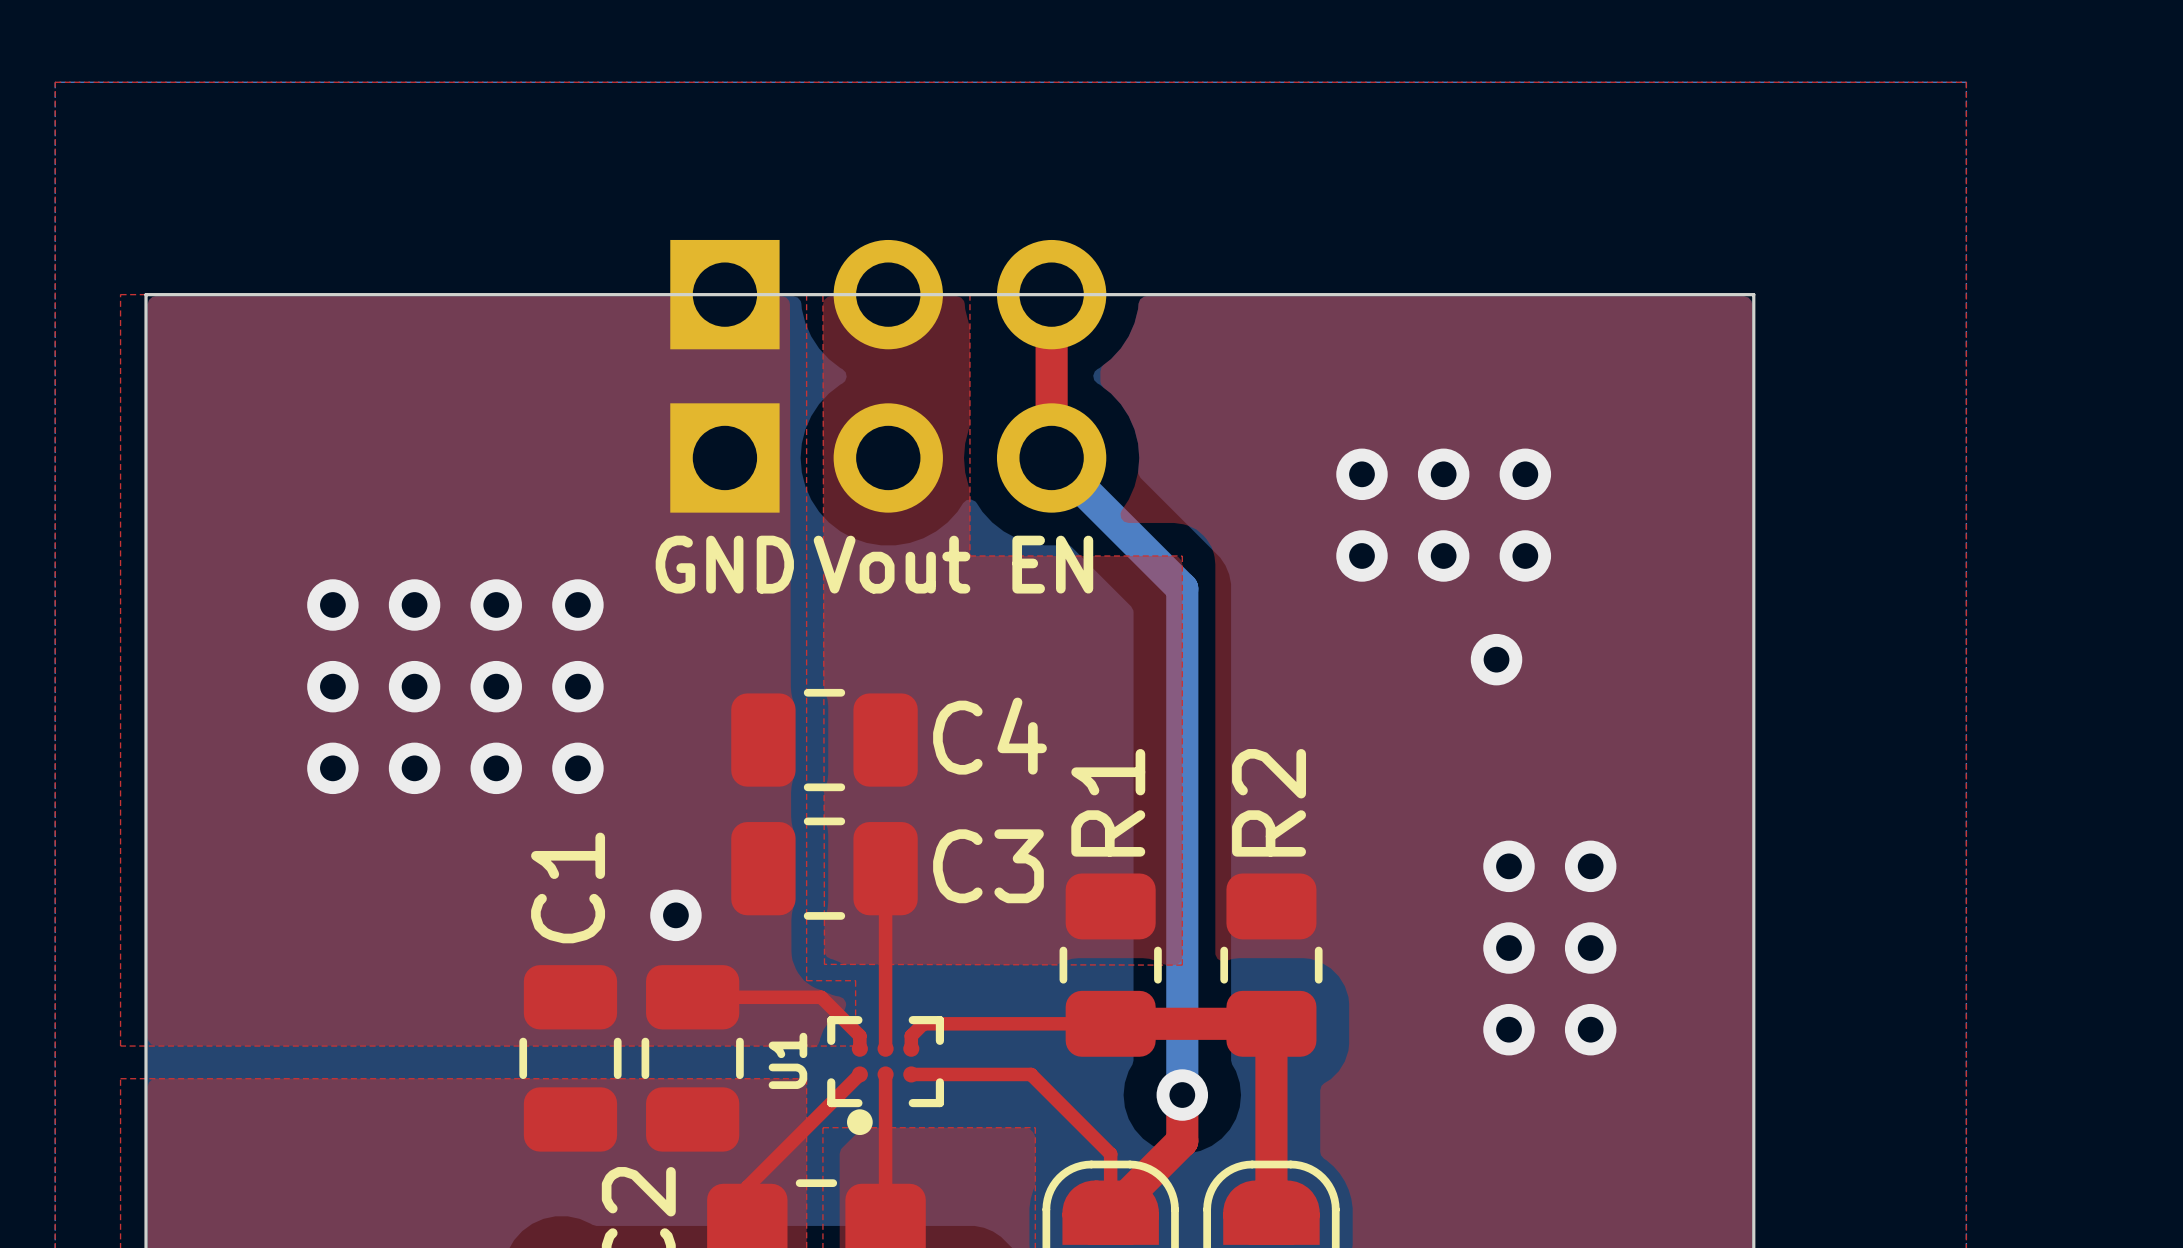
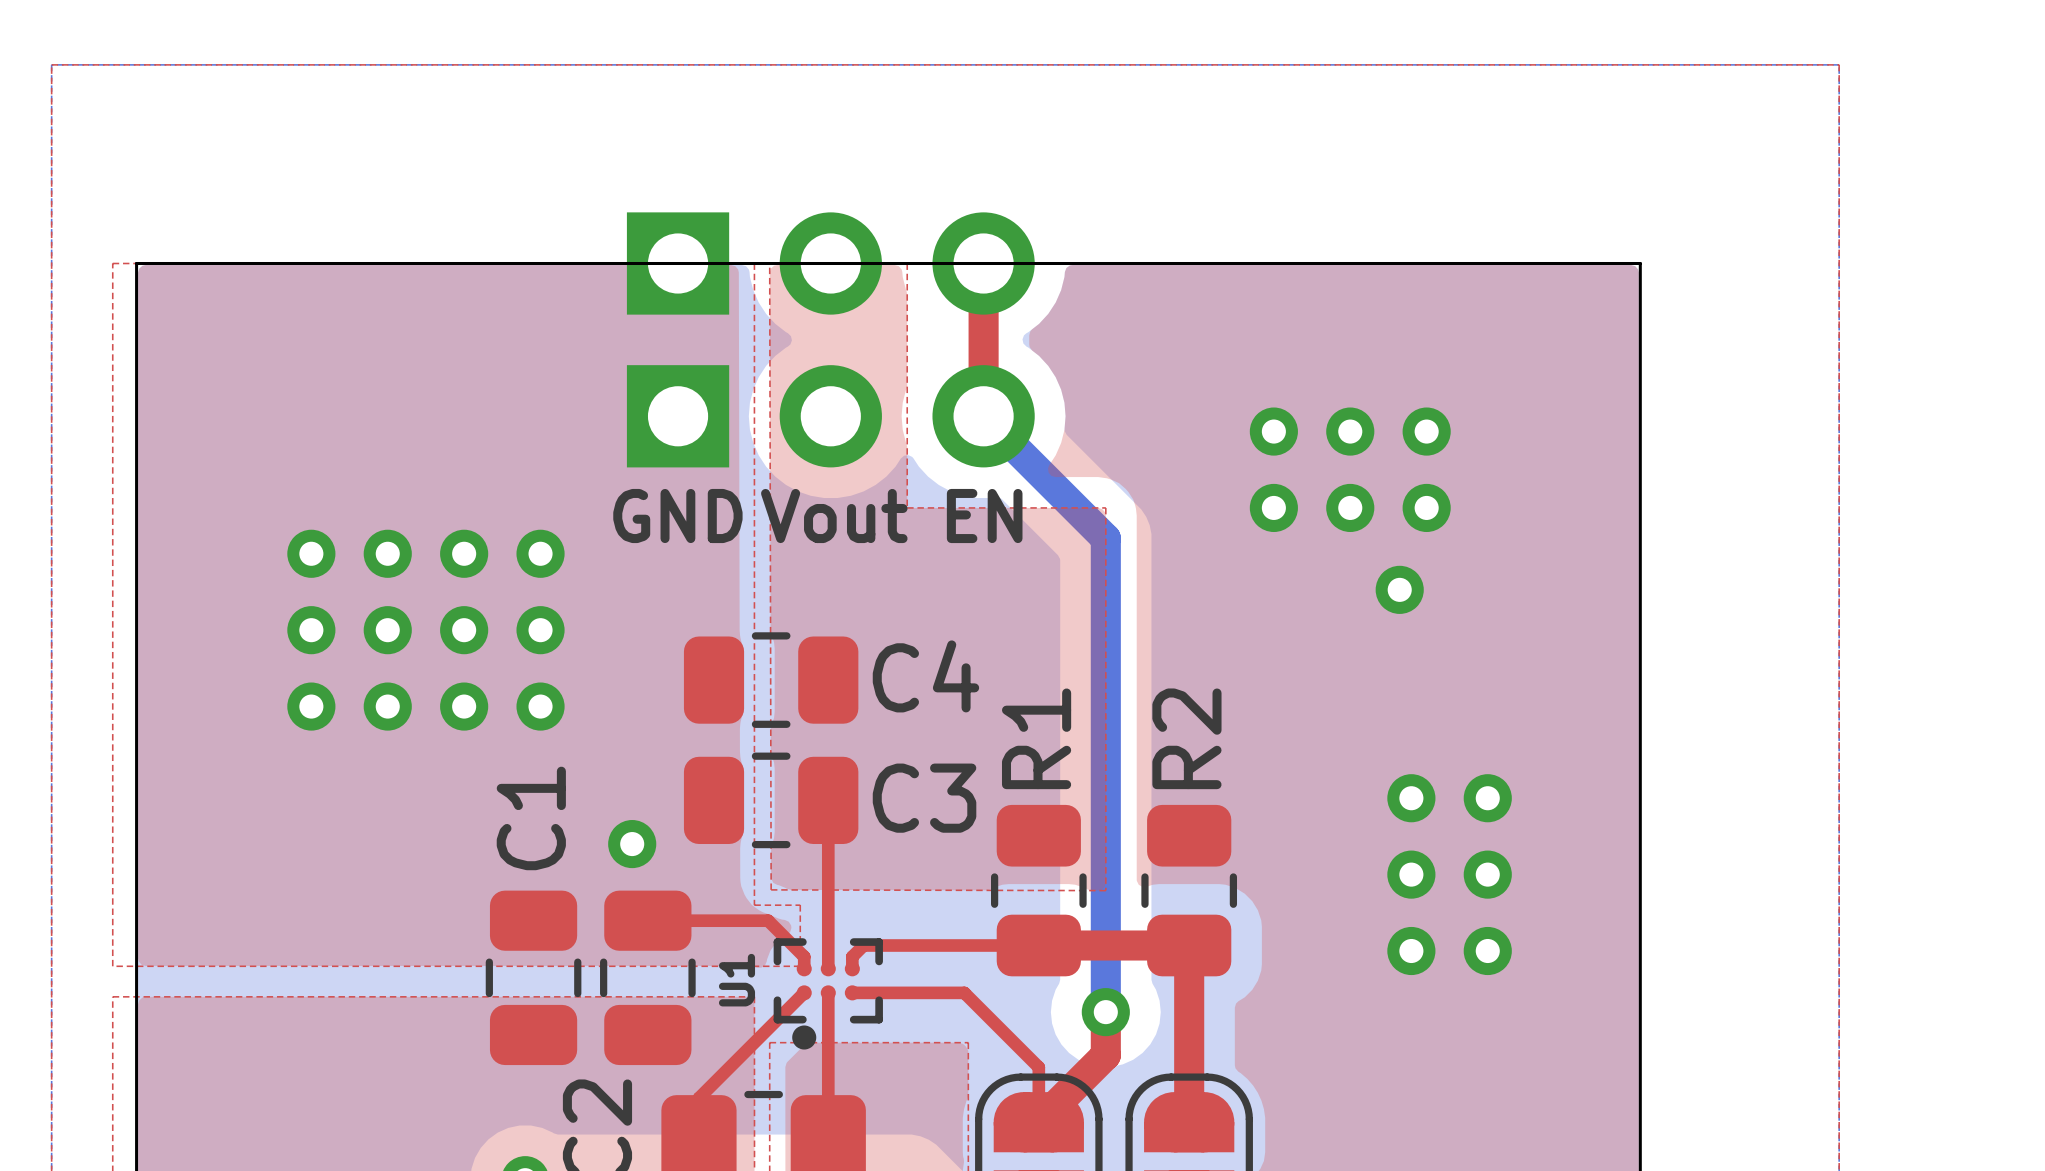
via position: (1496, 659) -> (1399, 589)

